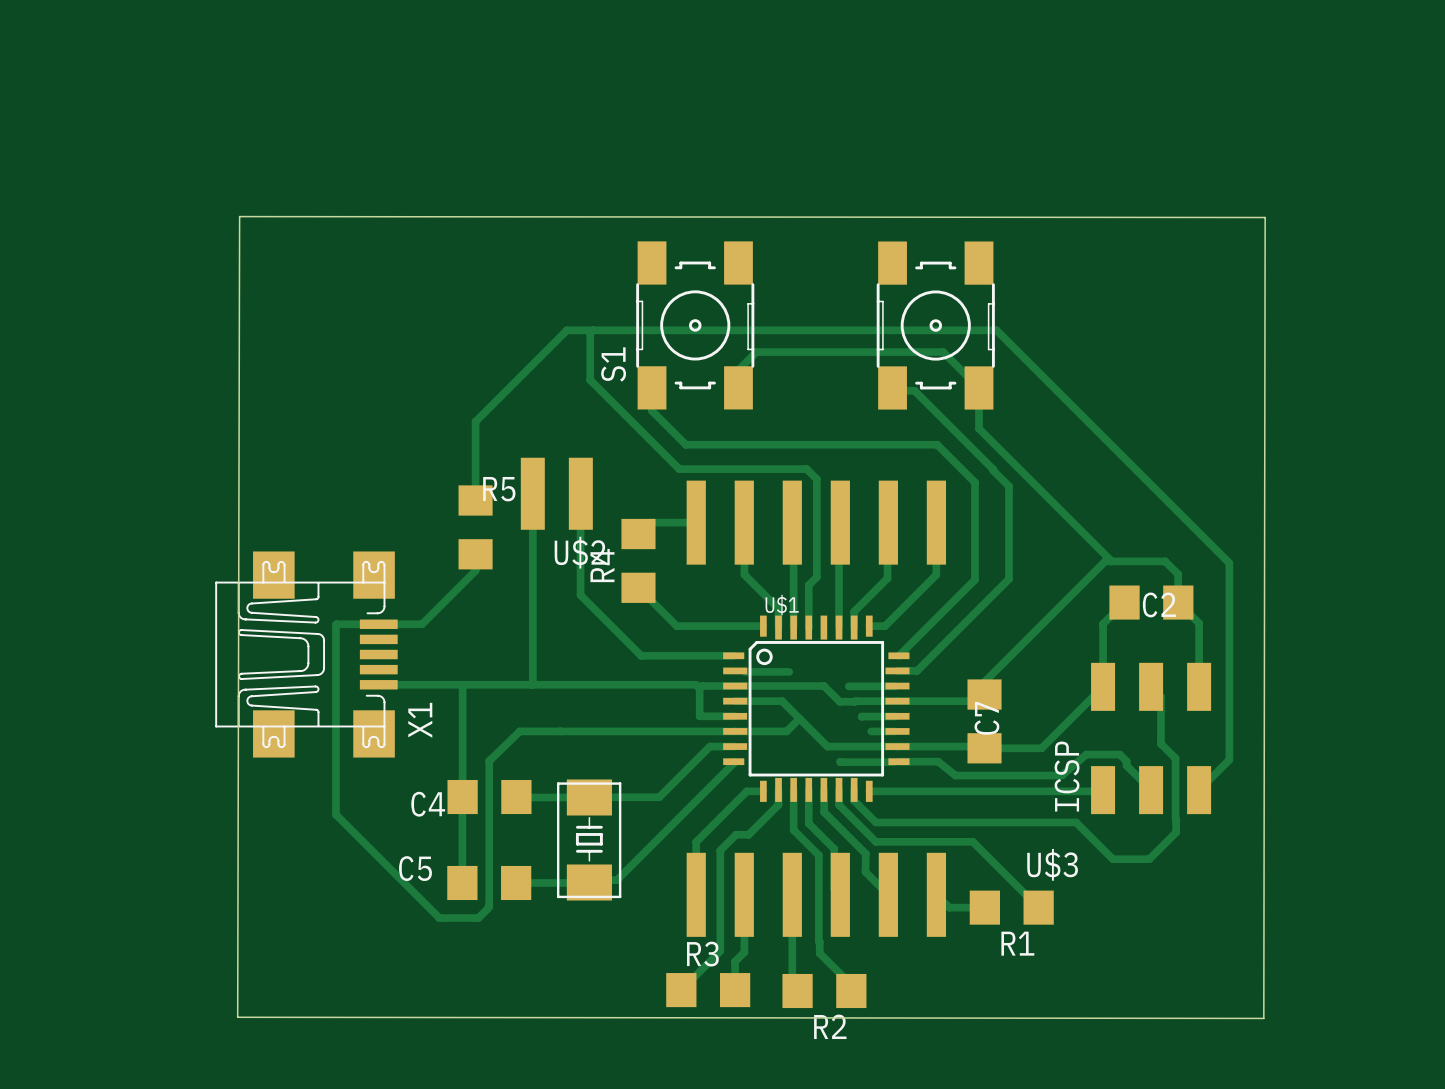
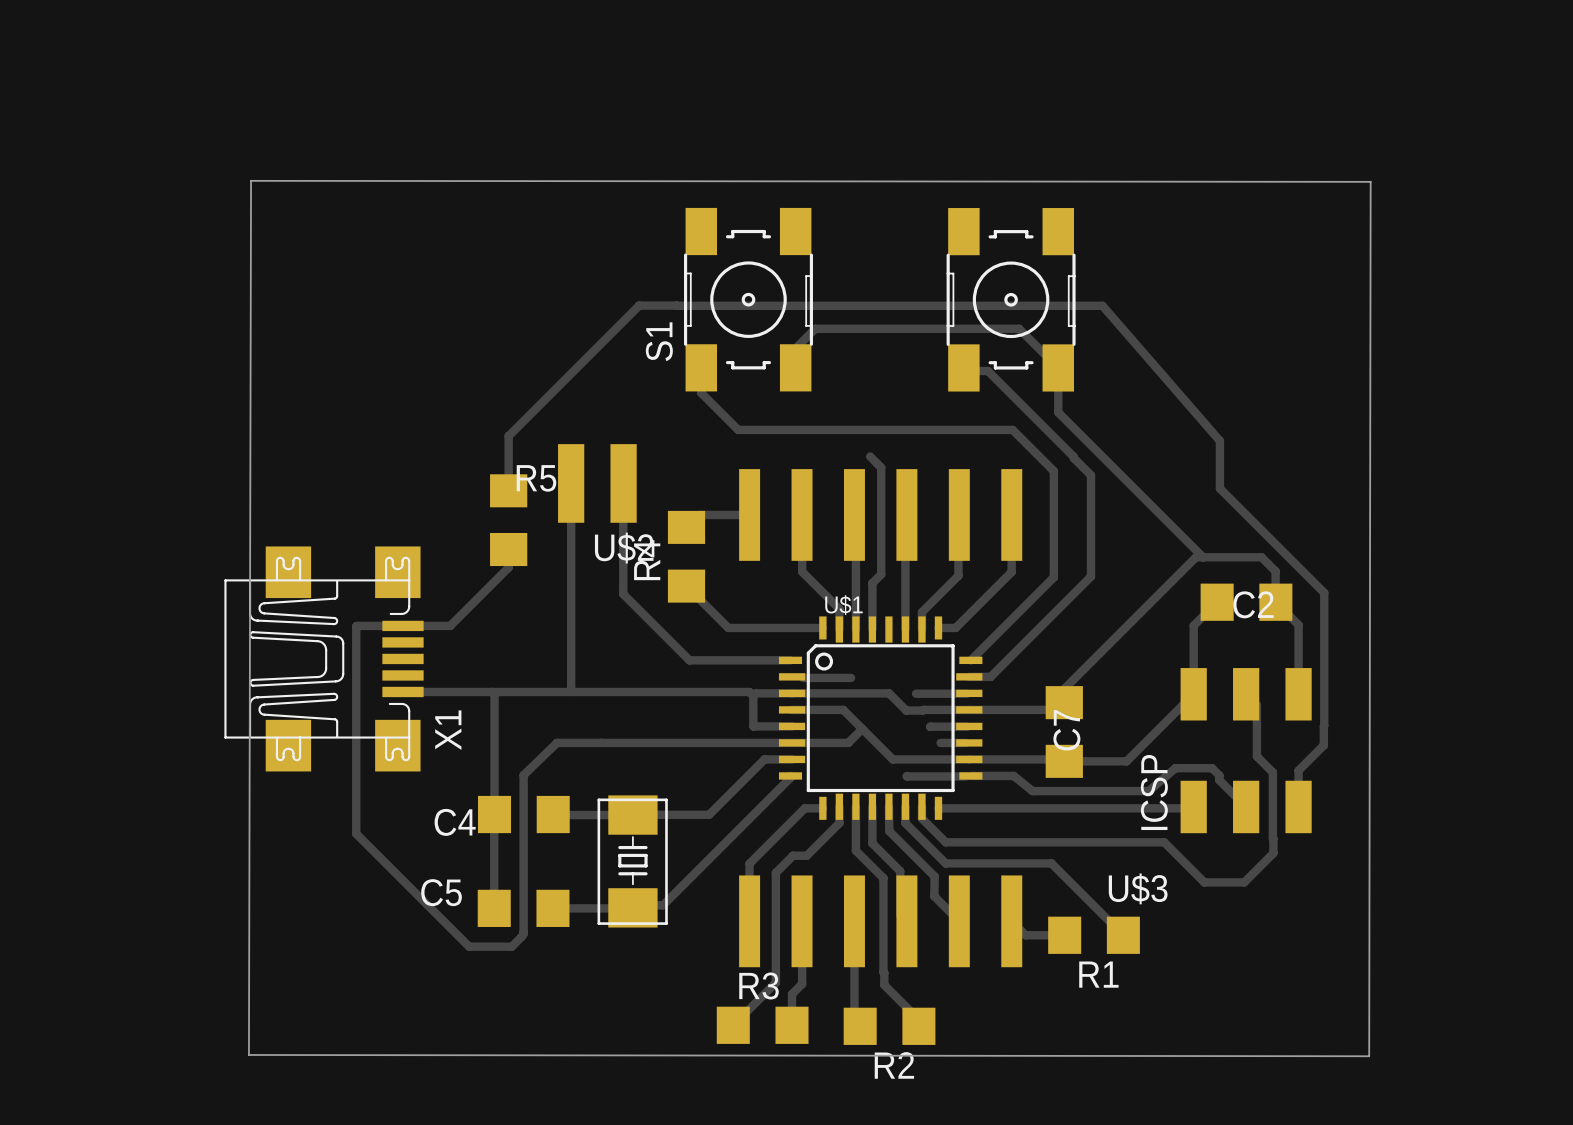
track: (593, 330) (590, 333) (590, 379) (679, 469) (806, 469) -> none
track: none -> (676, 305) (639, 305) (508, 436)
track: (475, 450) (475, 421) (566, 330) (996, 330) (1229, 563) (1229, 759) (1199, 790) -> (677, 305) (1102, 305) (1219, 440) (1219, 488) (1324, 592) (1323, 745) (1298, 770) (1298, 806)

